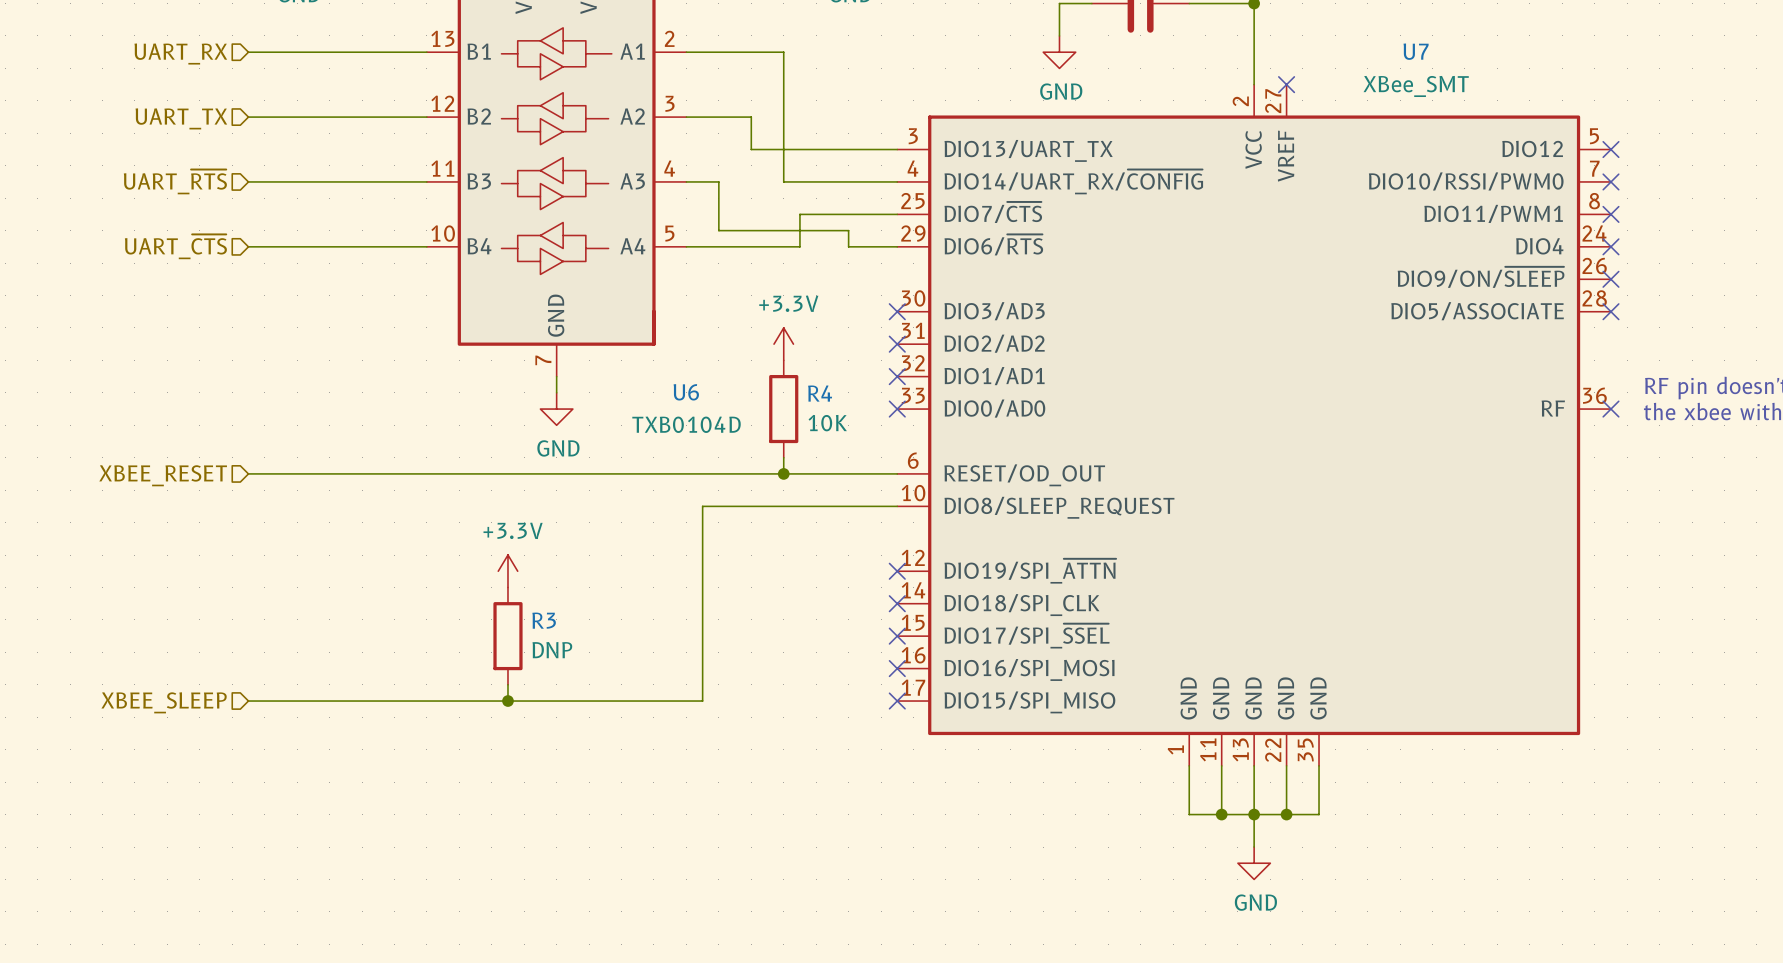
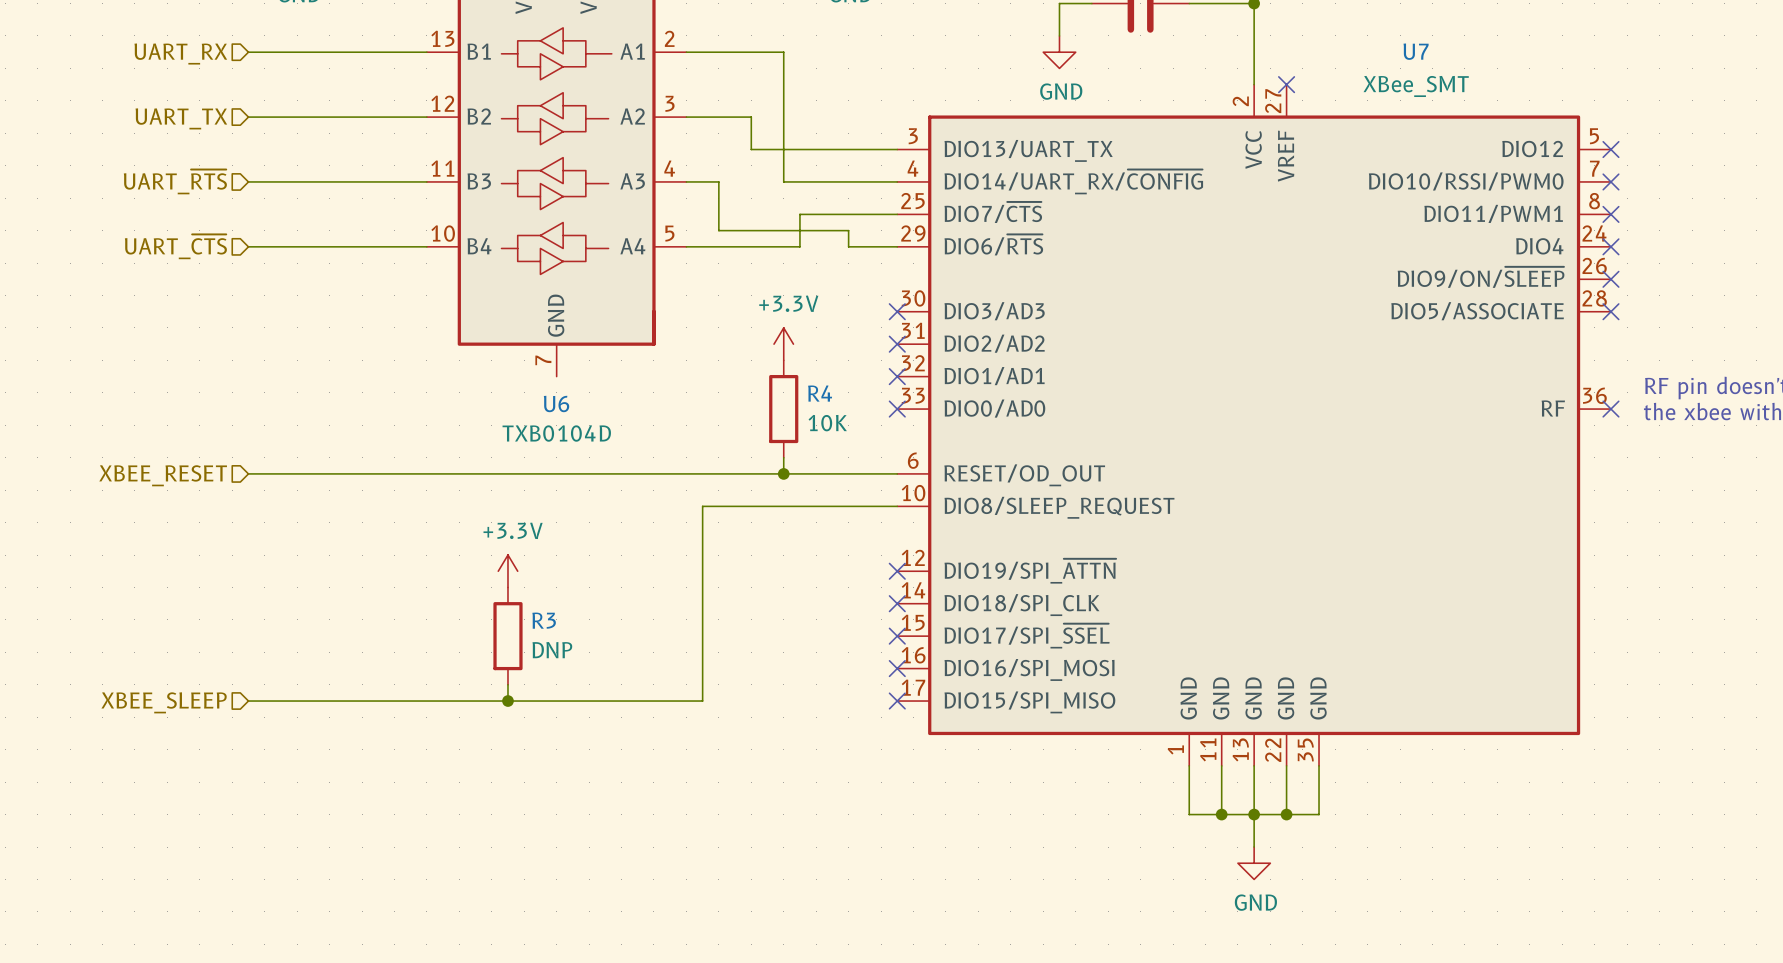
wire: (556, 376) (556, 392) -> none
U6 name position: U6 (686, 392) -> U6 (556, 403)
power symbol: GND (556, 409) -> none
U6 value position: TXB0104D (686, 424) -> TXB0104D (556, 433)

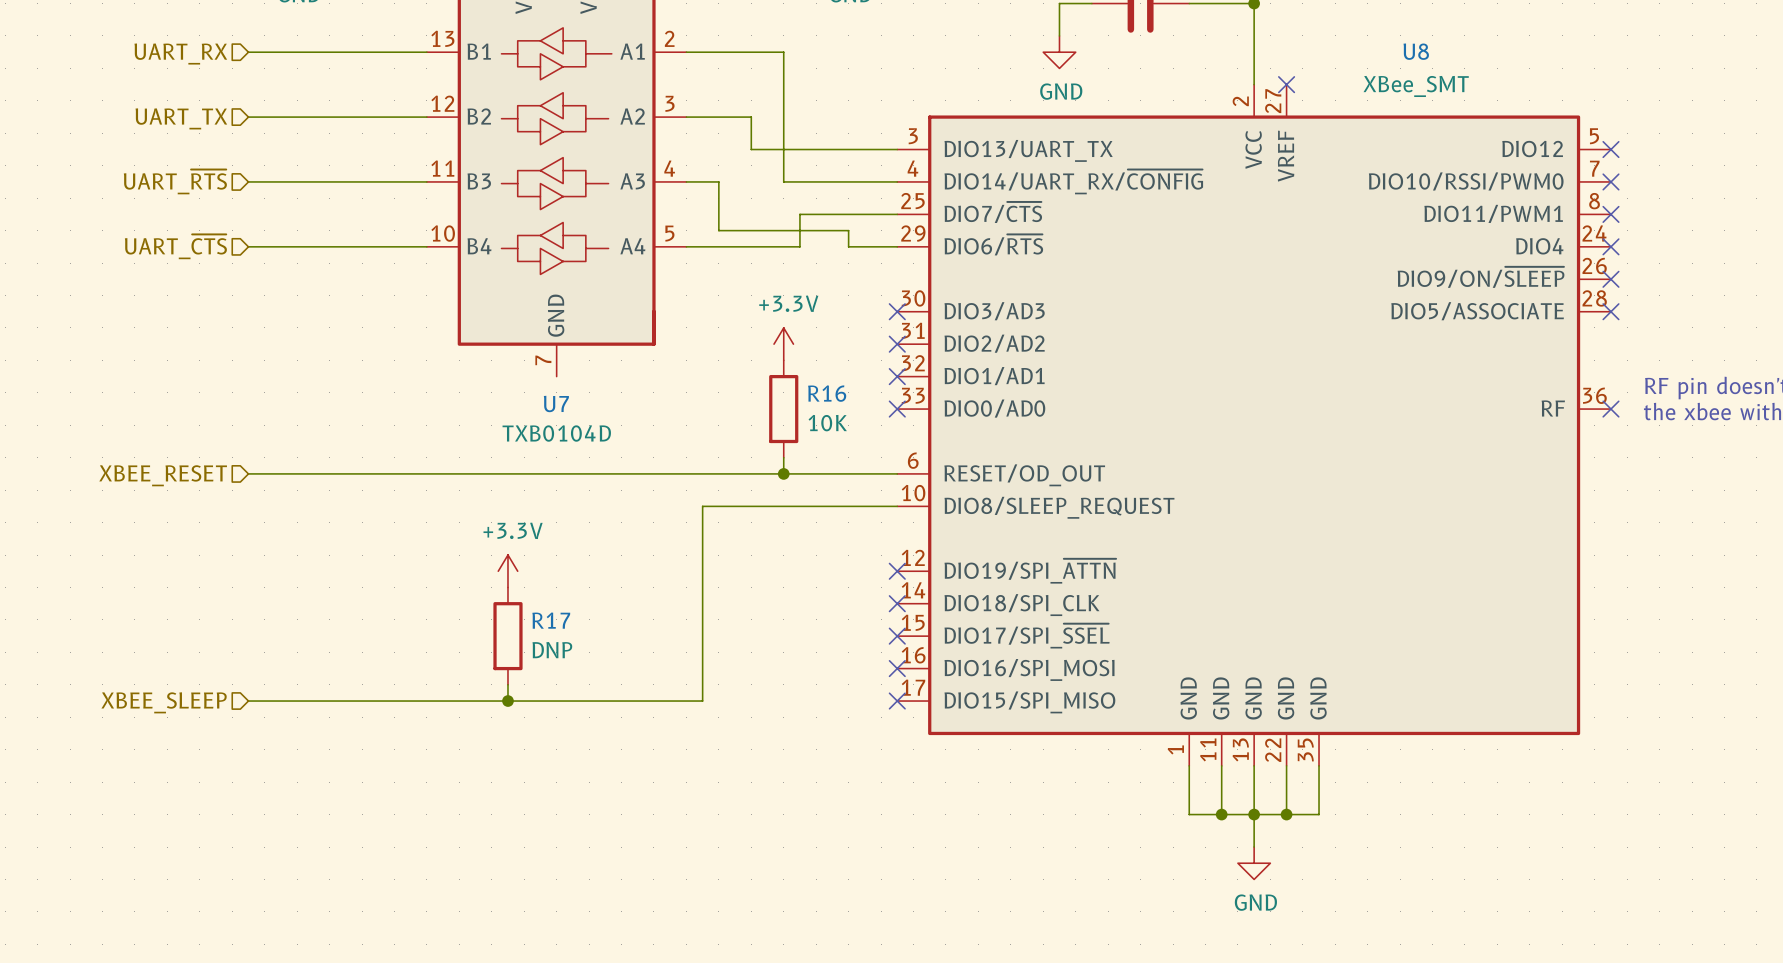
U7 name: U7 (1416, 51) -> U8 (1416, 51)
R4 name: R4 (820, 393) -> R16 (827, 393)
U6 name: U6 (556, 403) -> U7 (556, 403)
R3 name: R3 (544, 620) -> R17 (551, 620)

